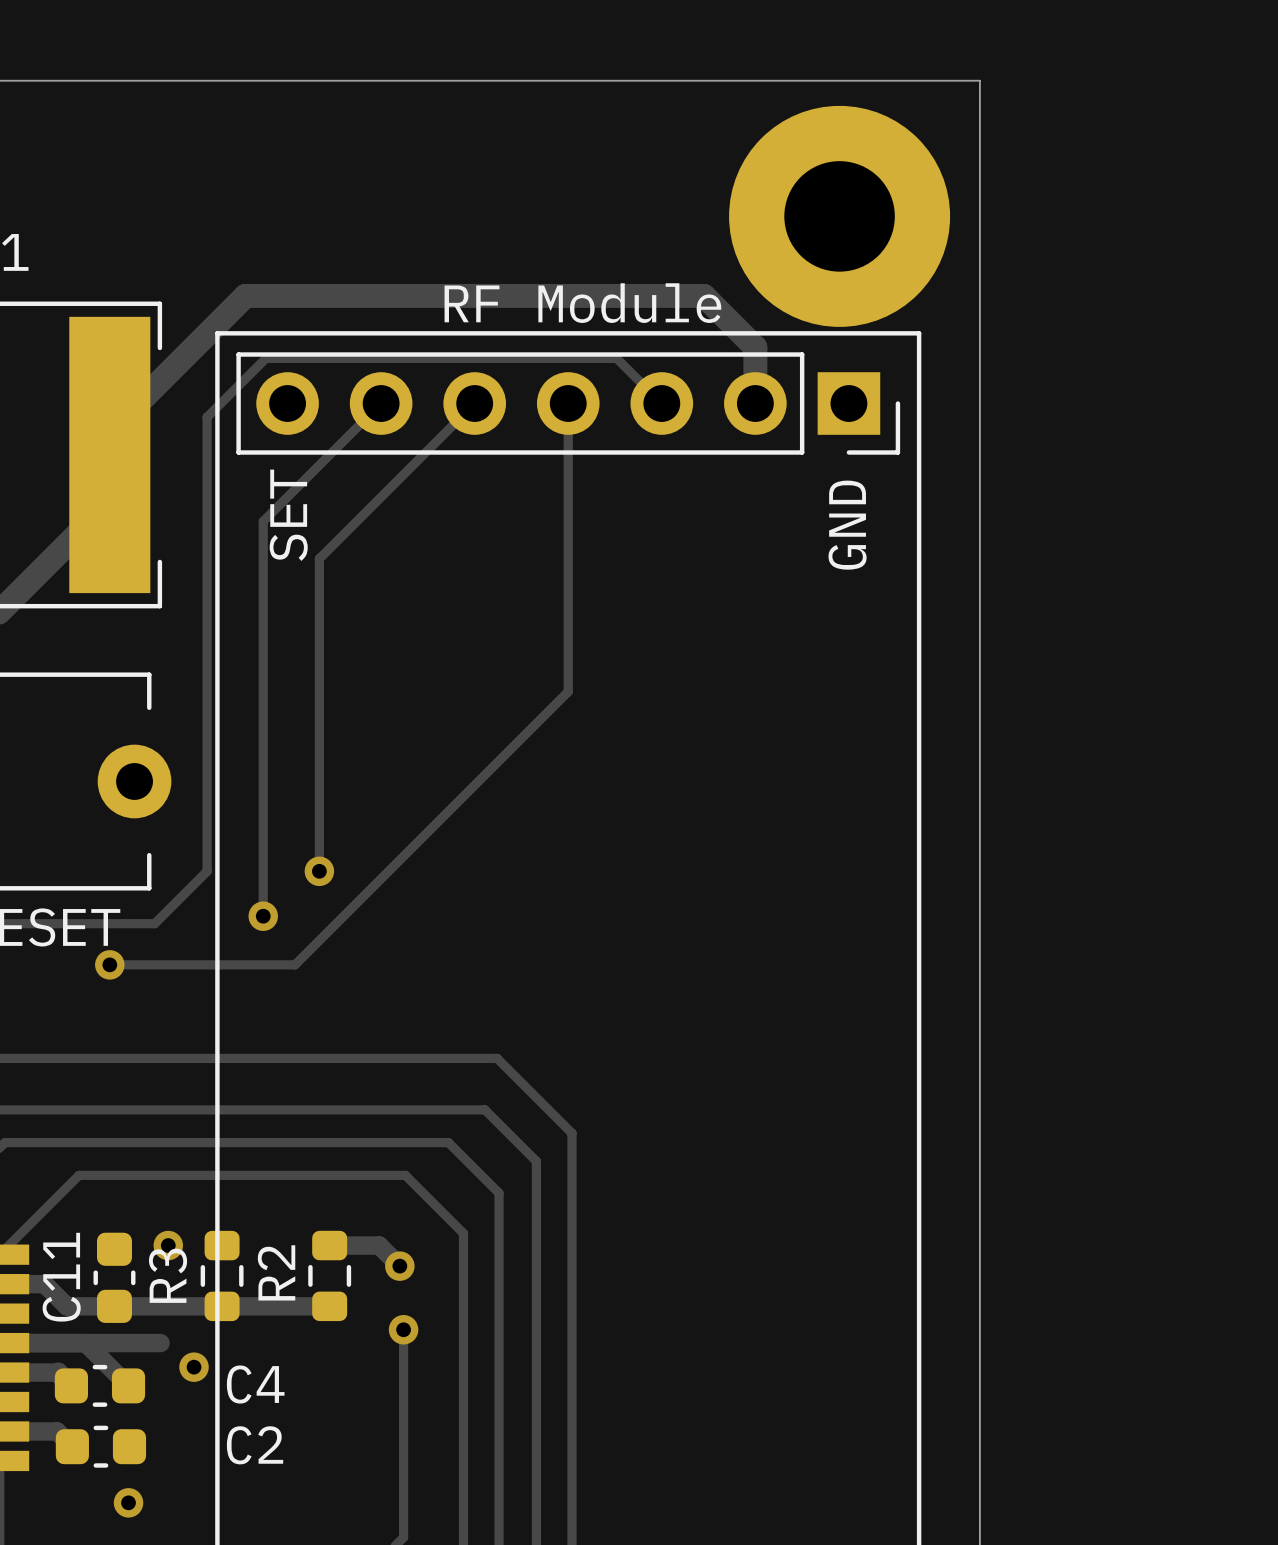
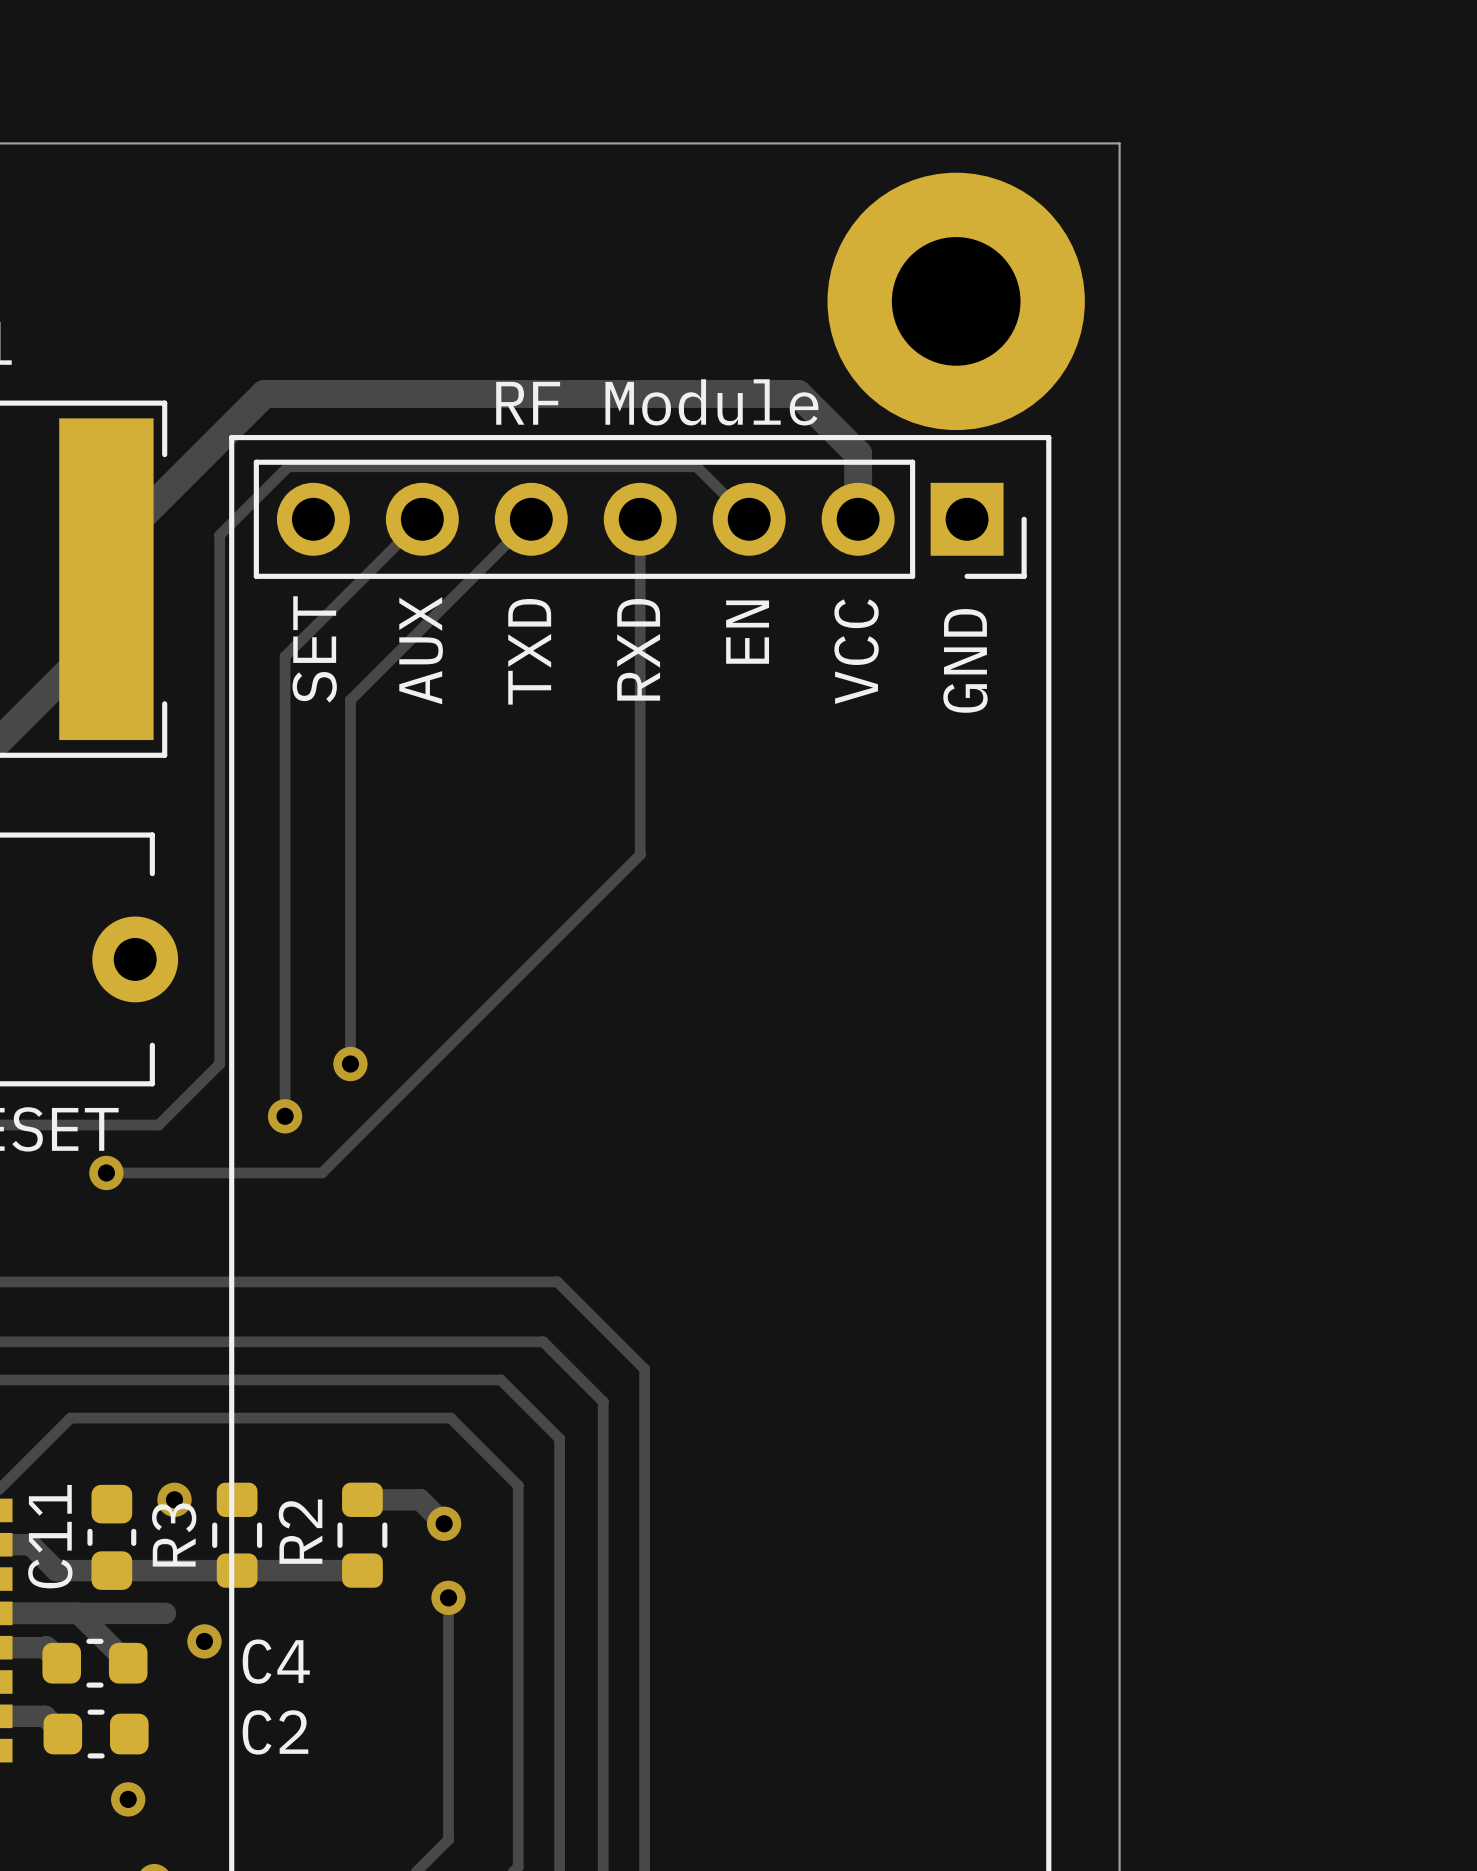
part text: none -> EN (747, 632)
part text: none -> RXD (638, 649)
part text: none -> AUX (421, 650)
part text: none -> TXD (529, 651)
part text: none -> VCC (856, 651)

